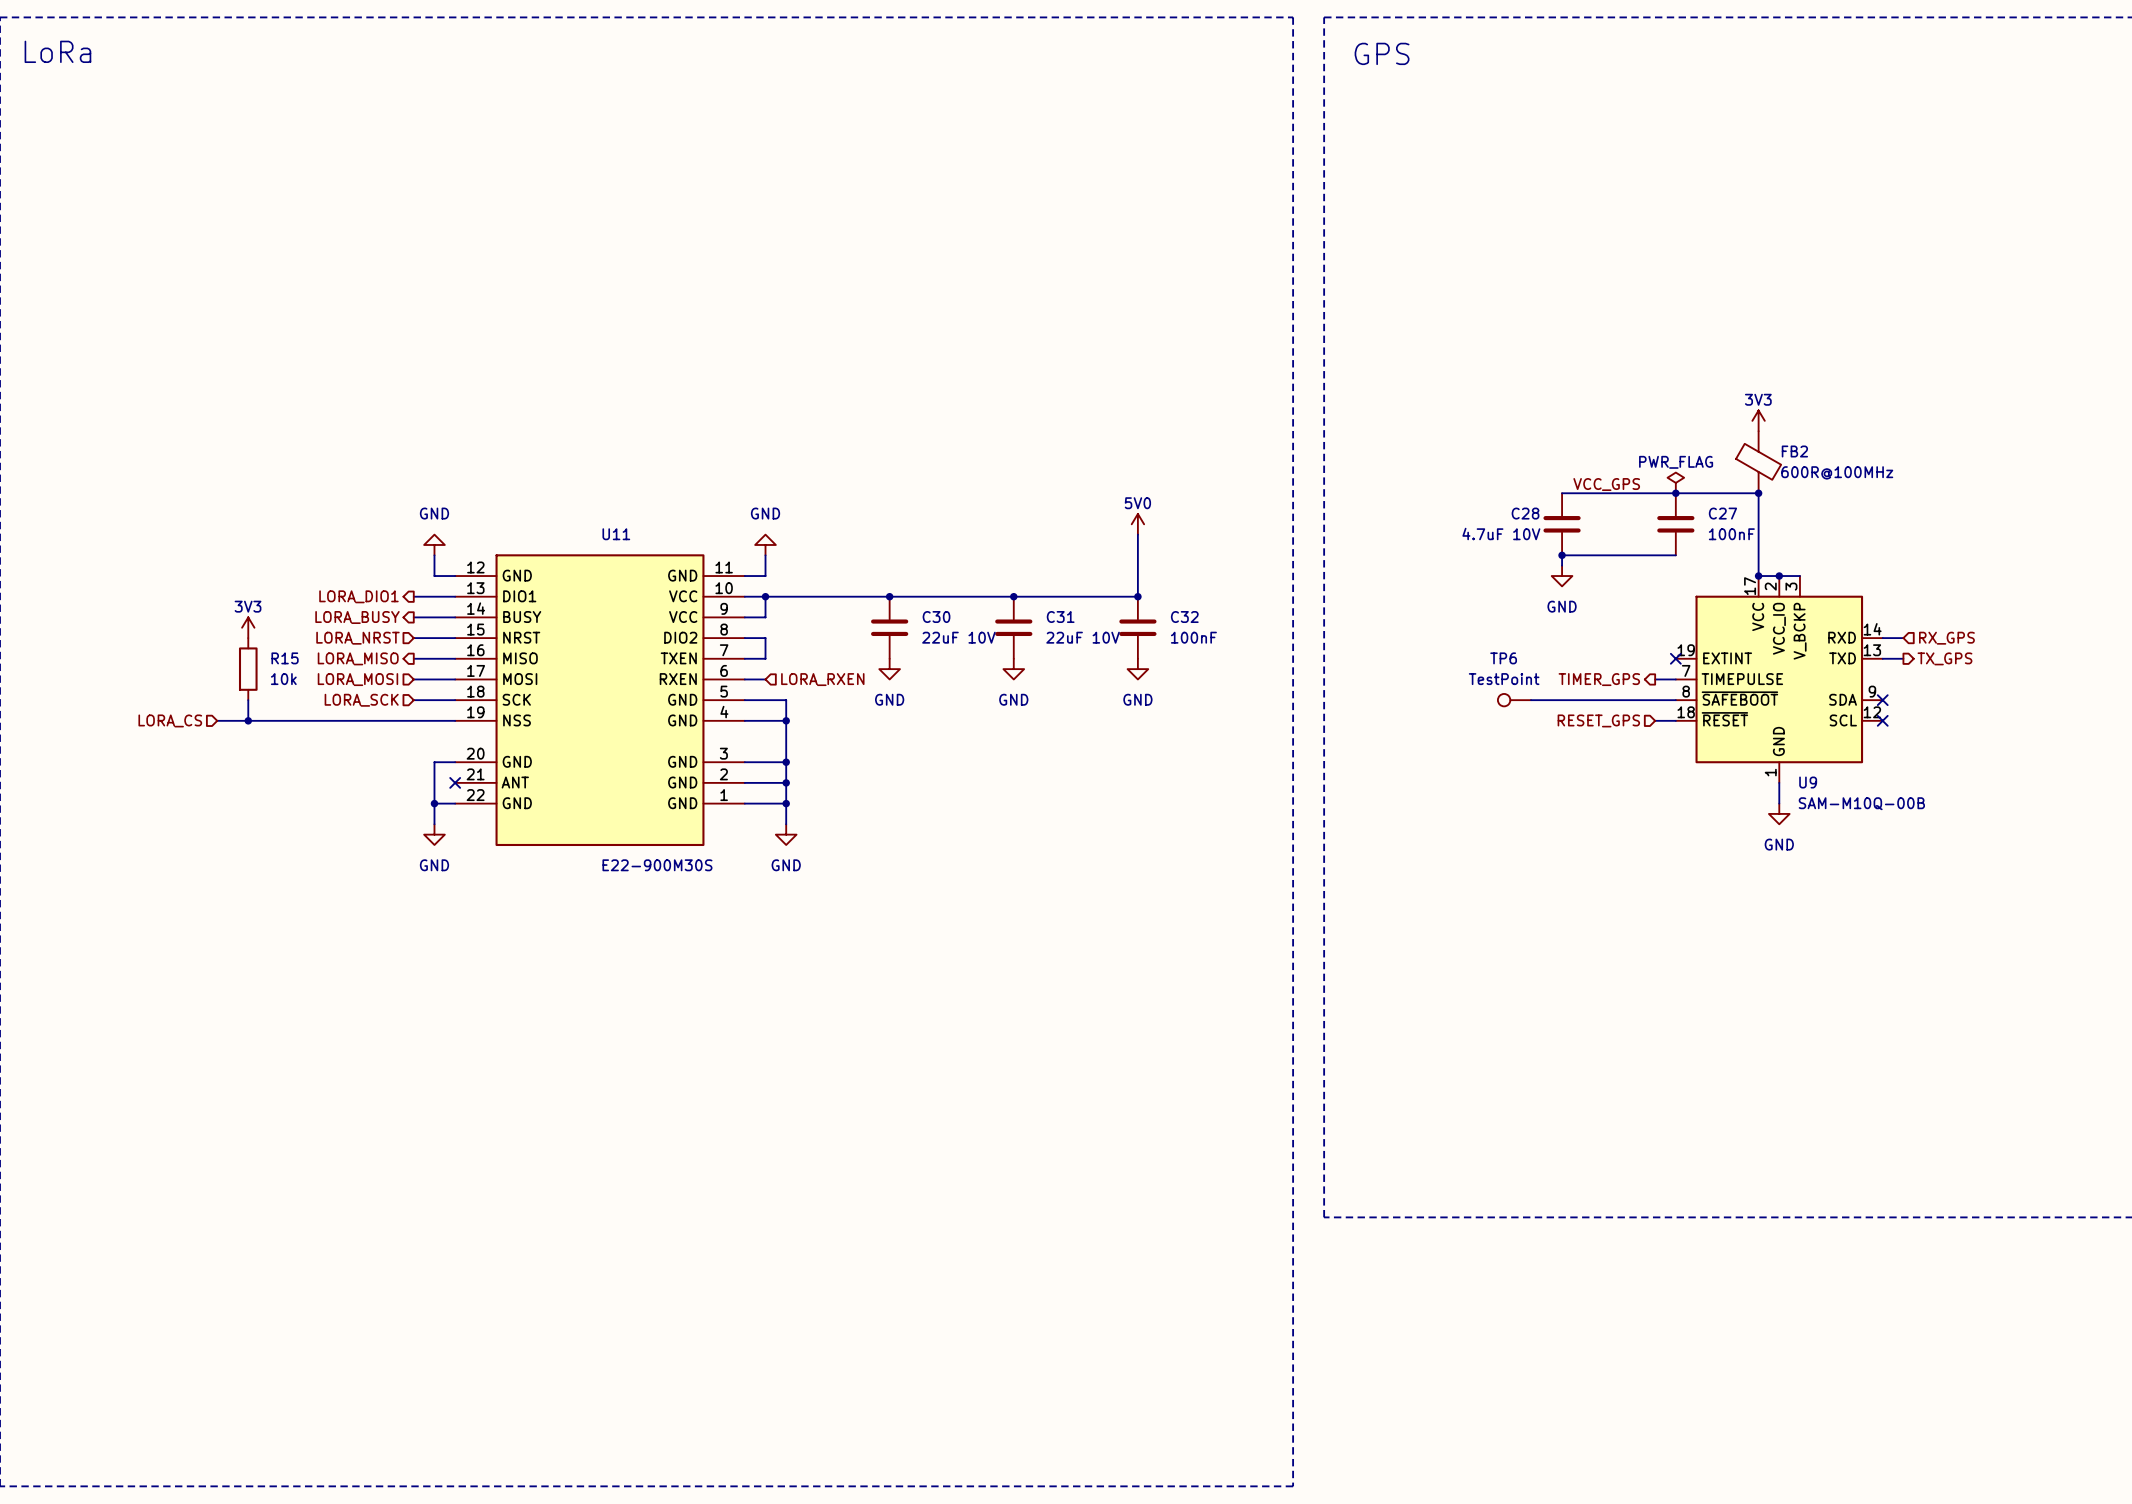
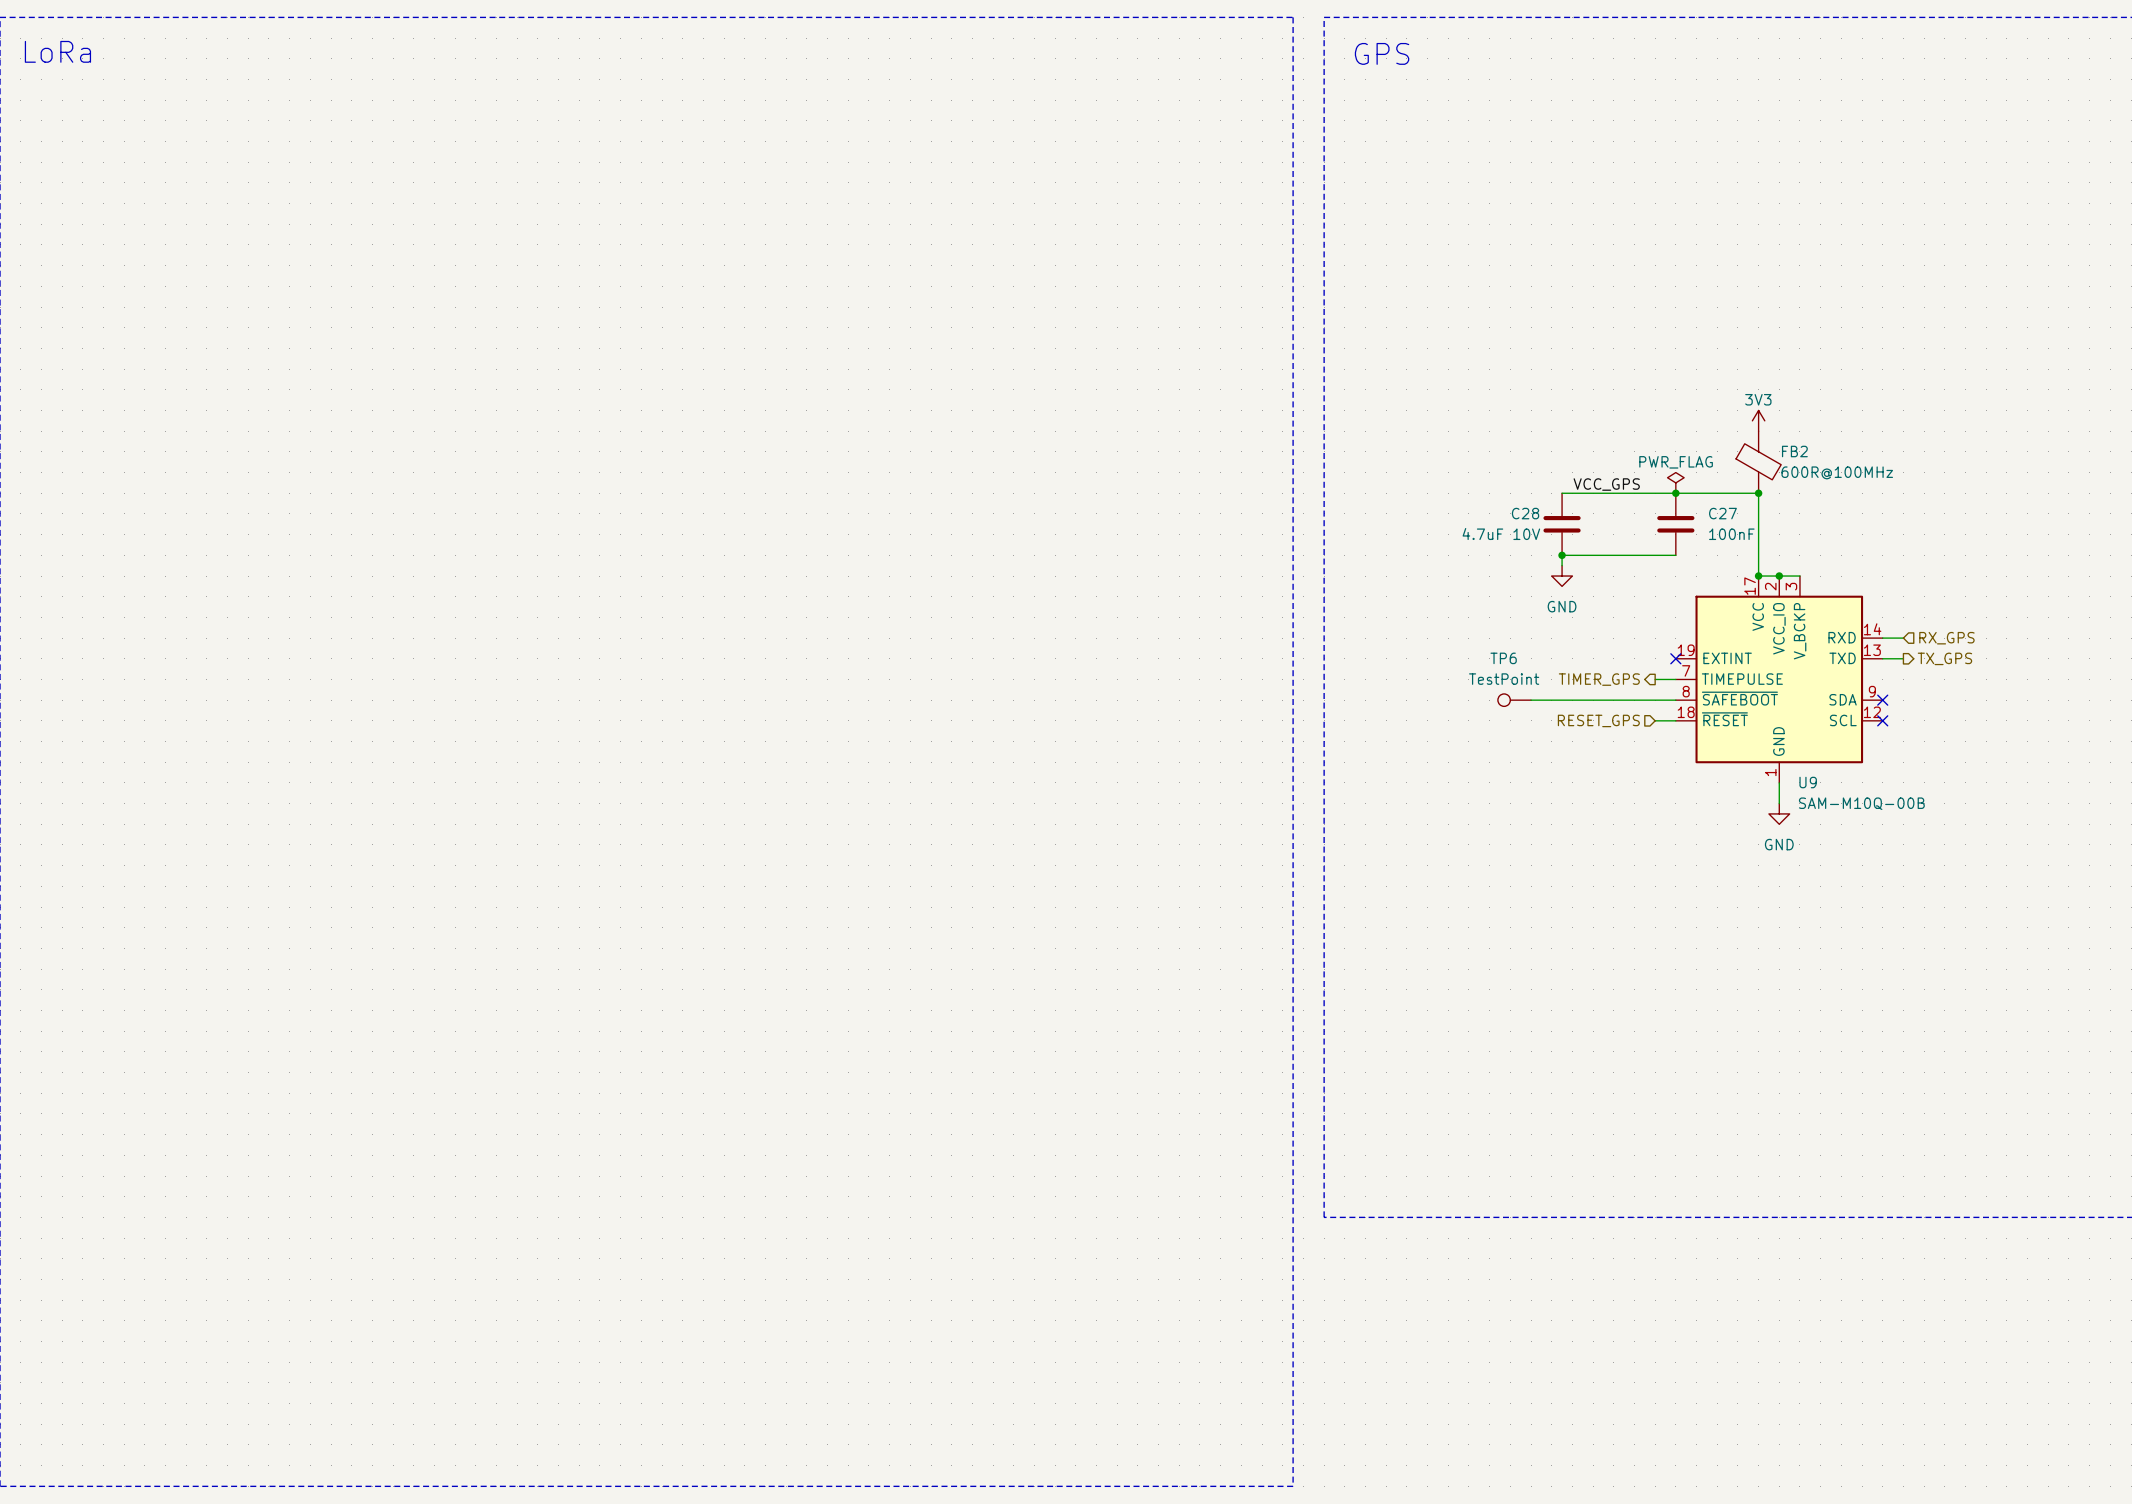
power symbol: 5V0 (1137, 524) -> none
wire: (1137, 534) (1137, 596) (744, 596) -> none
power symbol: GND (434, 544) -> none
power symbol: GND (765, 544) -> none
wire: (434, 555) (434, 576) (455, 576) -> none
wire: (765, 555) (765, 576) (744, 576) -> none
hierarchical label: LORA_DIO1 (358, 596) -> none
wire: (413, 596) (455, 596) -> none
wire: (765, 596) (765, 617) (744, 617) -> none
junction: (765, 596) -> none
junction: (889, 596) -> none
junction: (1013, 596) -> none
junction: (1137, 596) -> none
hierarchical label: LORA_BUSY (357, 617) -> none
wire: (413, 617) (455, 617) -> none
power symbol: 3V3 (248, 627) -> none
C30: 22uF 10V (889, 627) -> none
C31: 22uF 10V (1013, 627) -> none
C32: 100nF (1137, 627) -> none
hierarchical label: LORA_NRST (357, 638) -> none
wire: (413, 638) (455, 638) -> none
wire: (744, 638) (765, 638) (765, 658) (744, 658) -> none
hierarchical label: LORA_MISO (358, 658) -> none
wire: (413, 658) (455, 658) -> none
R15: 10k (248, 669) -> none
power symbol: GND (889, 669) -> none
power symbol: GND (1013, 669) -> none
power symbol: GND (1137, 669) -> none
hierarchical label: LORA_MOSI (357, 679) -> none
wire: (413, 679) (455, 679) -> none
wire: (744, 679) (765, 679) -> none
hierarchical label: LORA_RXEN (822, 679) -> none
wire: (248, 700) (248, 720) -> none
hierarchical label: LORA_SCK (361, 700) -> none
wire: (413, 700) (455, 700) -> none
U11: E22-900M30S (599, 700) -> none
wire: (744, 700) (786, 700) (786, 824) -> none
hierarchical label: LORA_CS (170, 720) -> none
wire: (217, 720) (455, 720) -> none
junction: (248, 720) -> none
wire: (744, 720) (786, 720) -> none
junction: (786, 720) -> none
wire: (455, 762) (434, 762) (434, 824) -> none
wire: (744, 762) (786, 762) -> none
junction: (786, 762) -> none
no-connect mark: (455, 782) -> none
wire: (744, 782) (786, 782) -> none
junction: (786, 782) -> none
wire: (434, 803) (455, 803) -> none
junction: (434, 803) -> none
wire: (744, 803) (786, 803) -> none
junction: (786, 803) -> none
power symbol: GND (434, 834) -> none
power symbol: GND (786, 834) -> none

